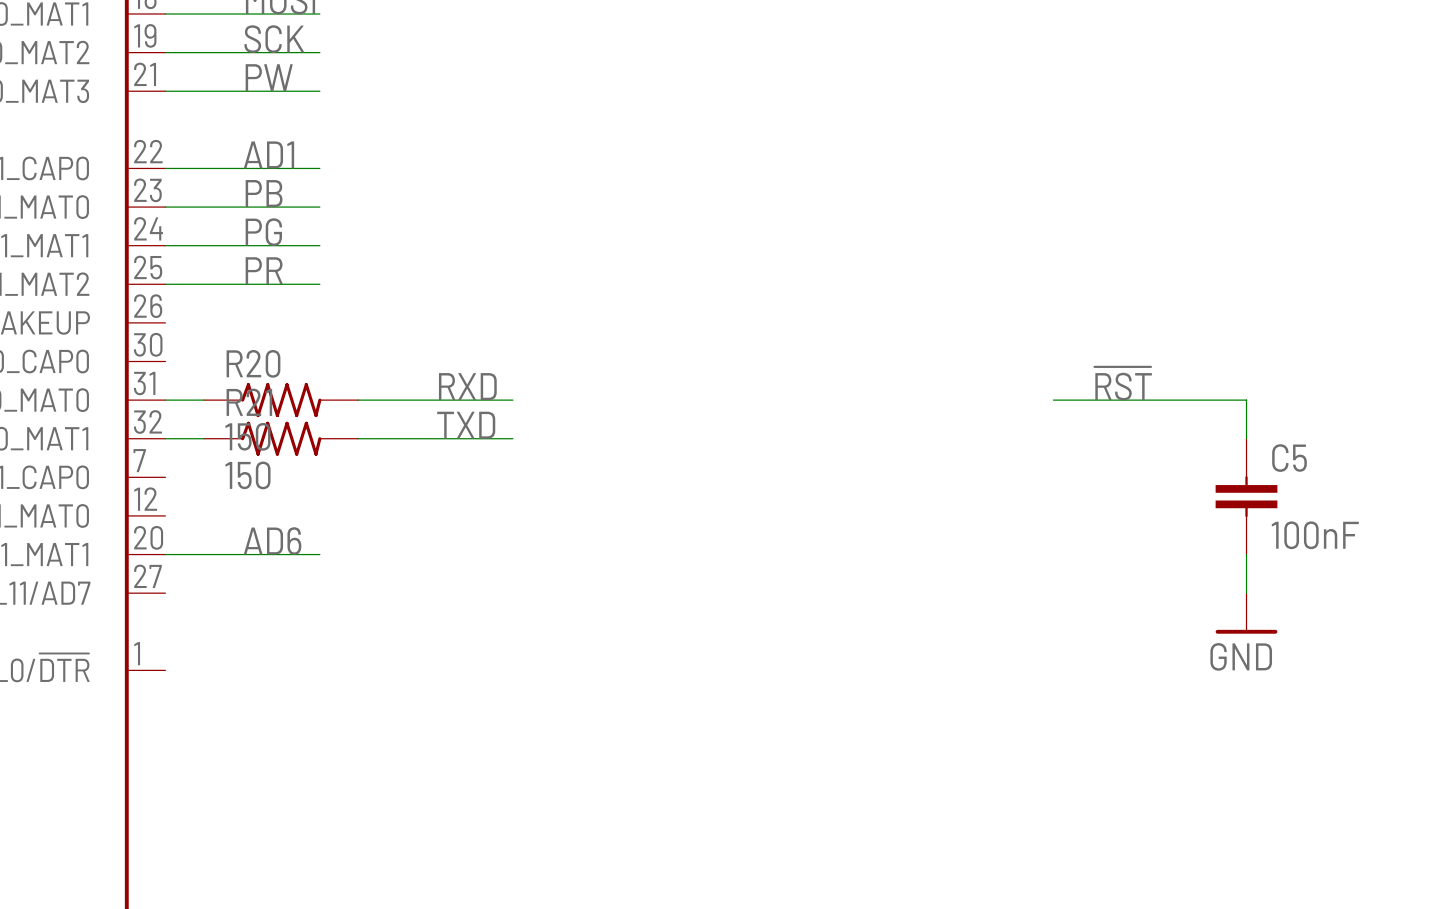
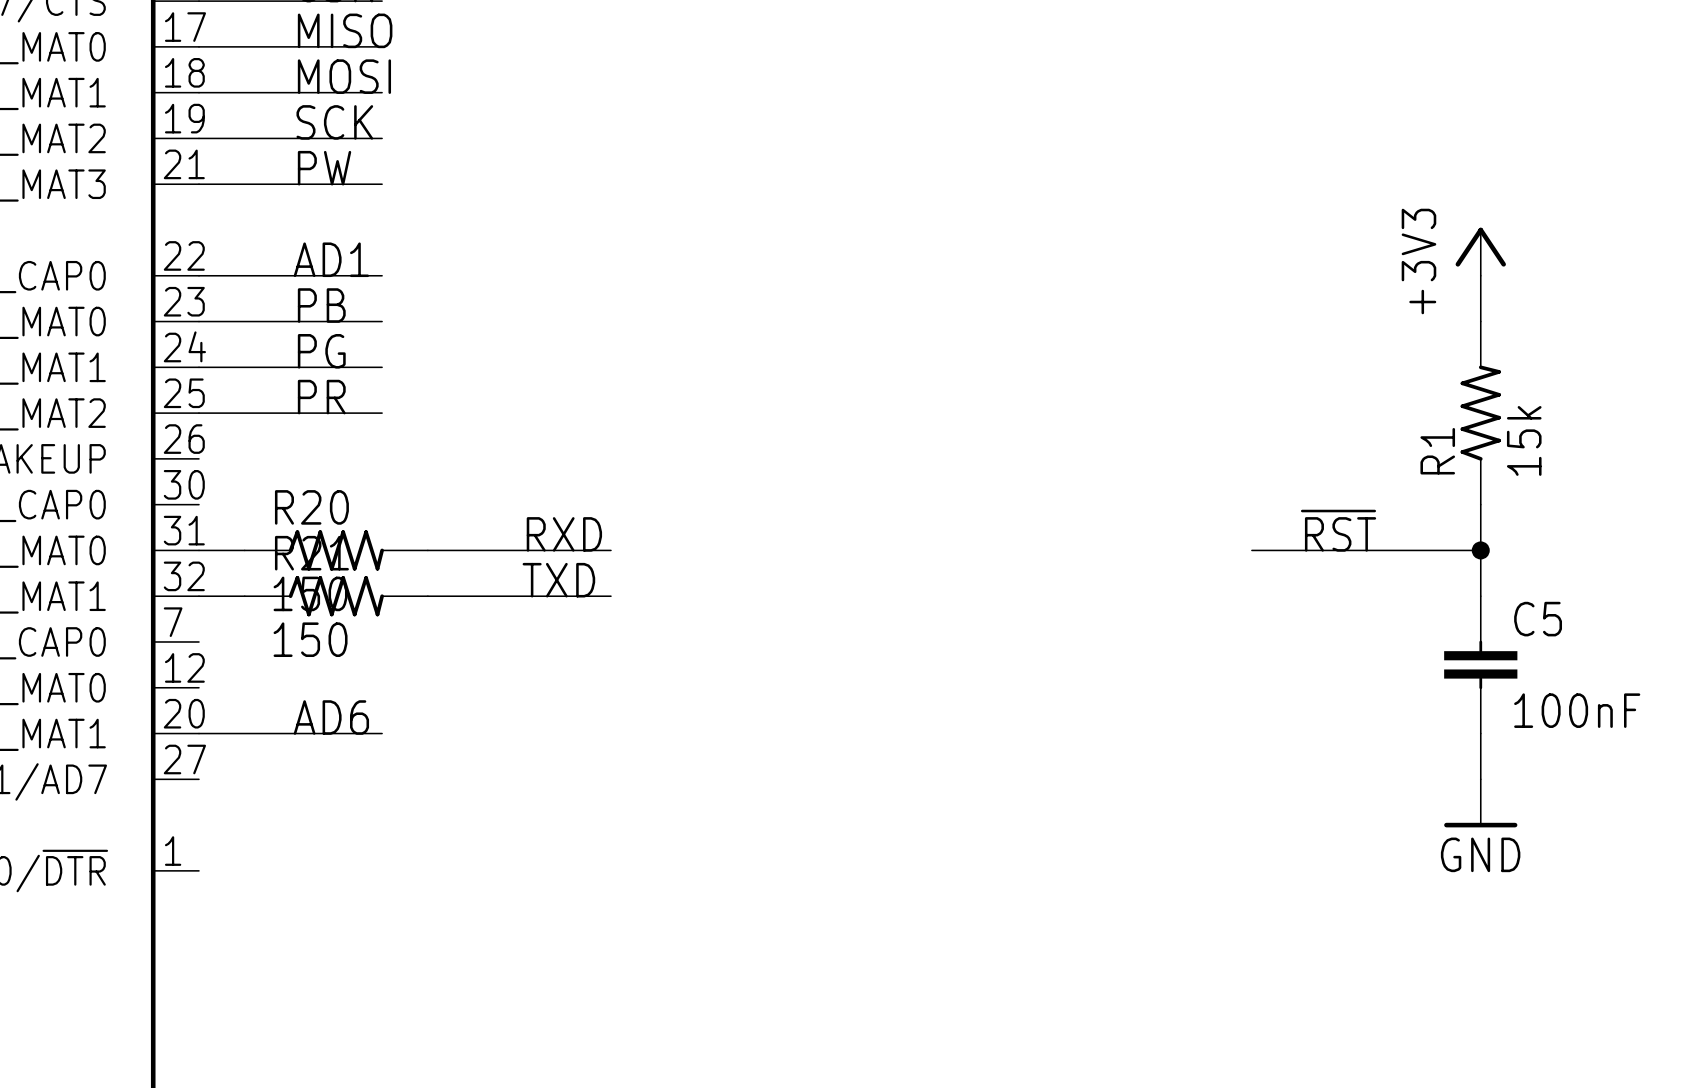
power symbol: none -> +3V3 (1480, 251)
wire: none -> (1480, 275) (1480, 321)
R1: none -> 15k (1480, 413)
wire: none -> (1480, 504) (1480, 550)
junction: none -> (1480, 550)

